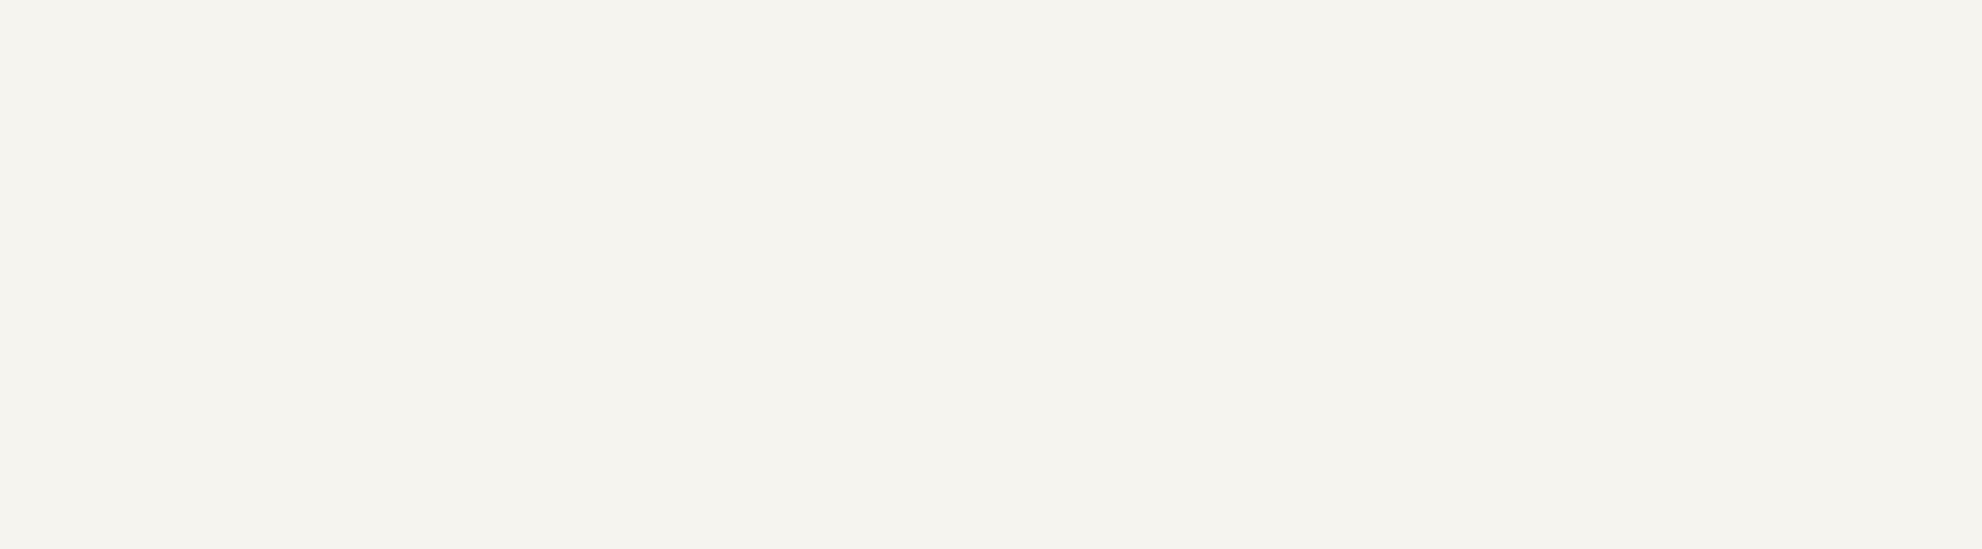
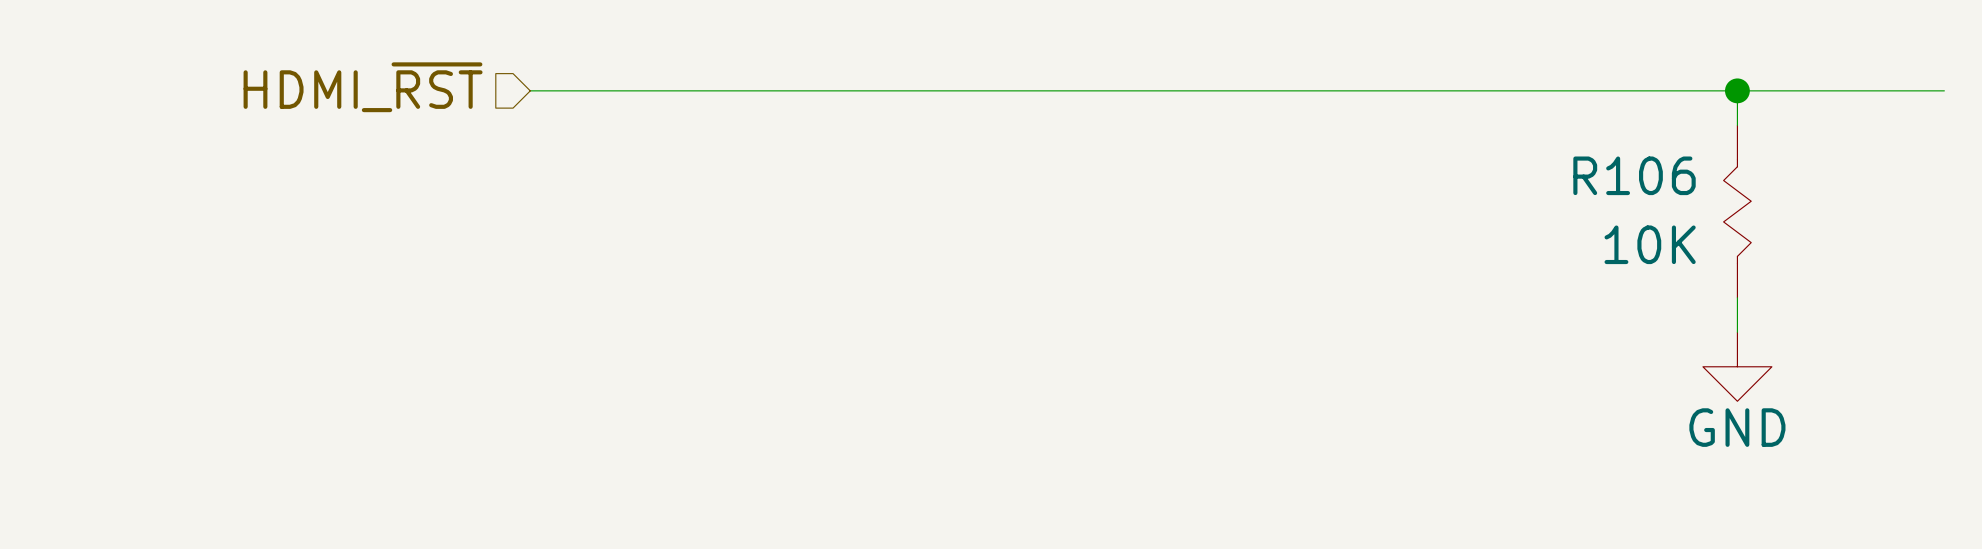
hierarchical label: none -> HDMI_~{RST} (363, 87)
wire: none -> (530, 90) (1944, 90)
wire: none -> (1737, 90) (1737, 125)
junction: none -> (1737, 90)
R106: none -> 10K (1737, 211)
wire: none -> (1737, 297) (1737, 332)
power symbol: none -> GND (1737, 366)

